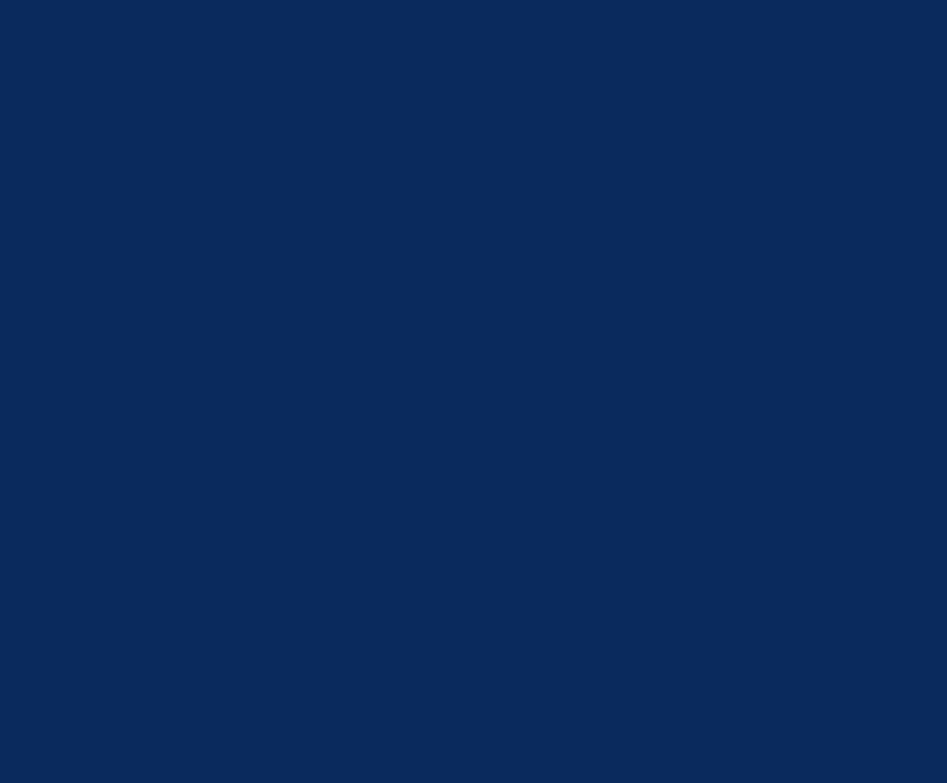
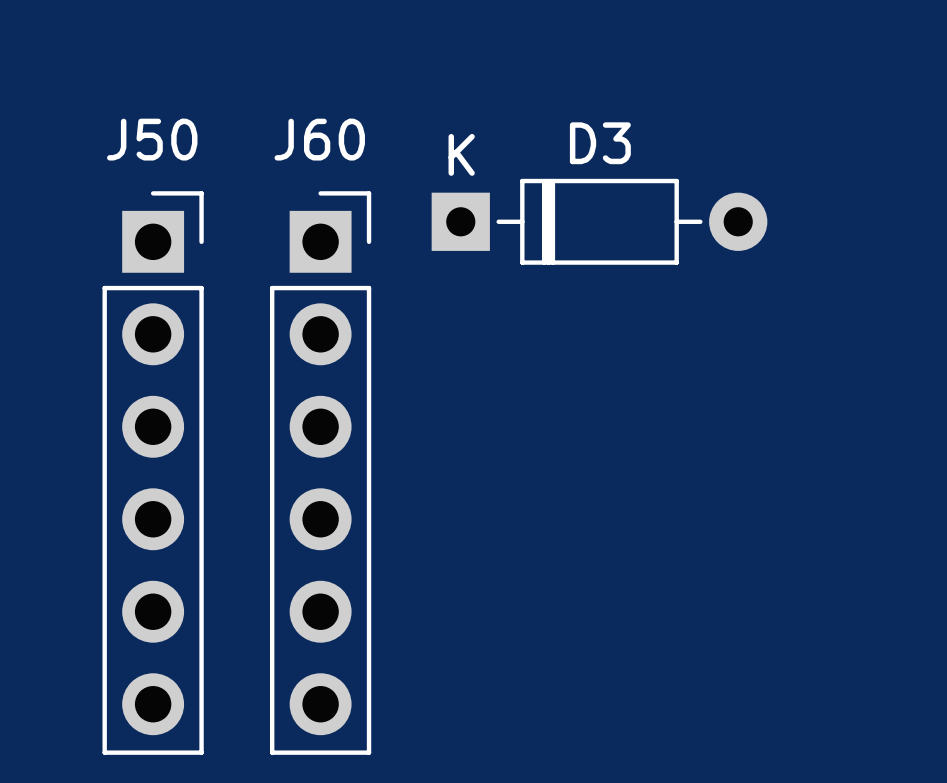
D3: none -> (599, 221)
J50: none -> (153, 473)
J60: none -> (320, 473)

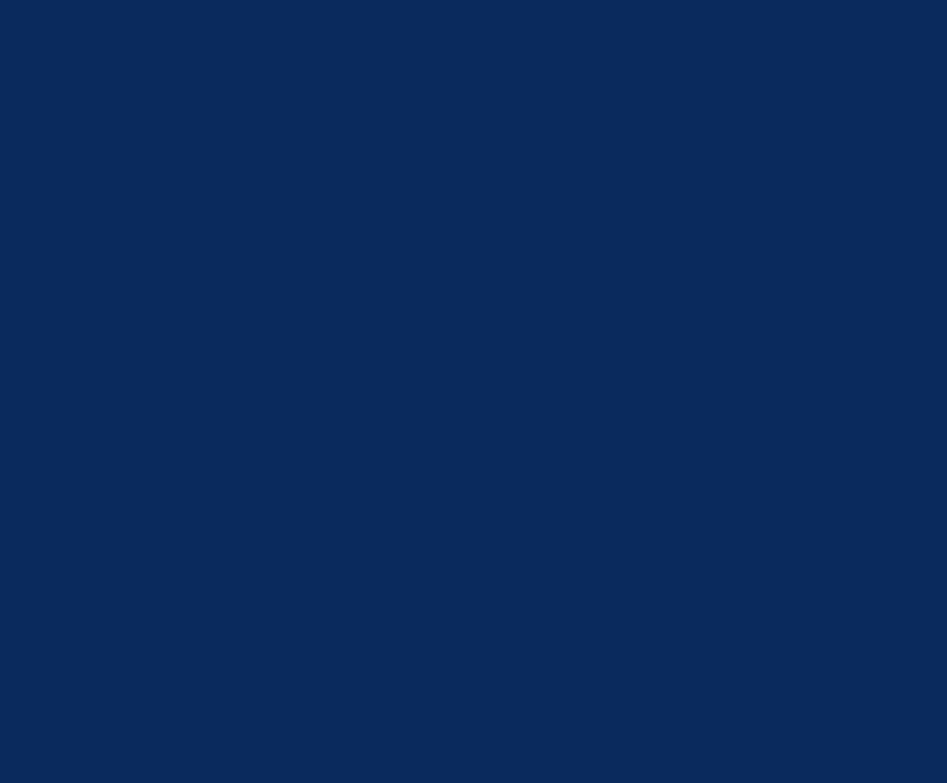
D3: (599, 221) -> none
J50: (153, 473) -> none
J60: (320, 473) -> none

